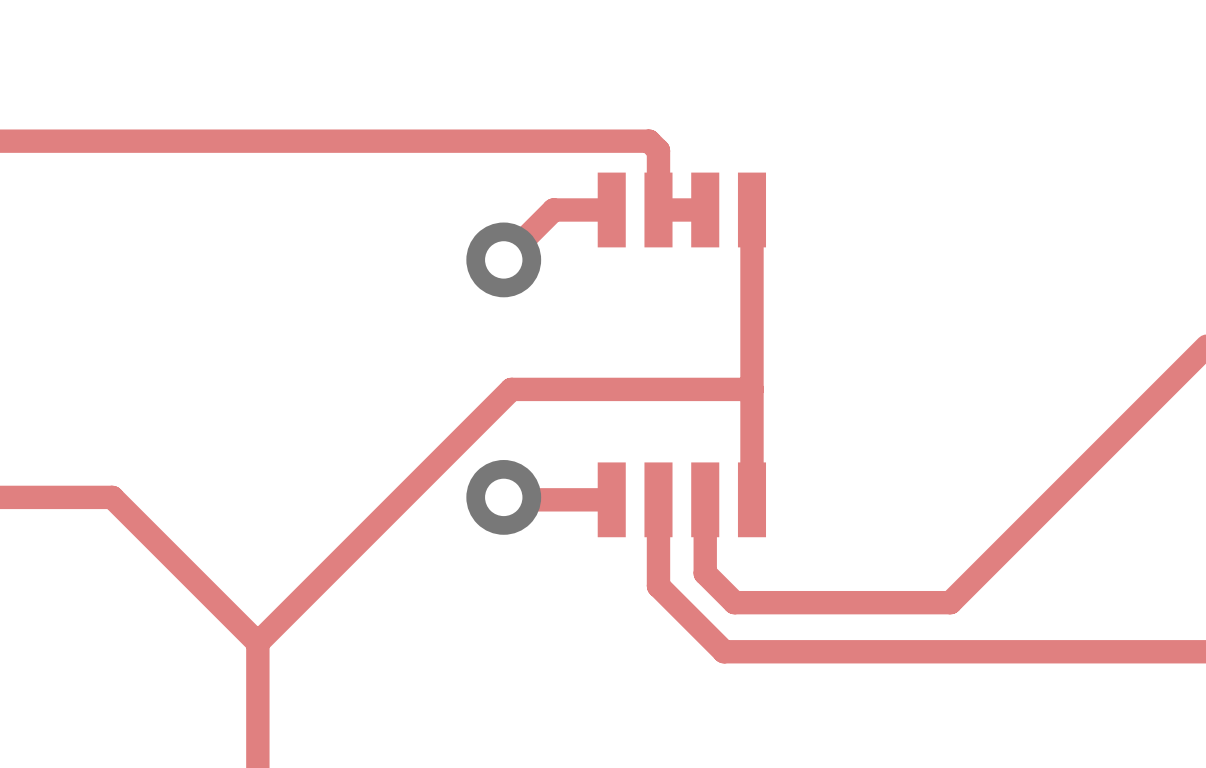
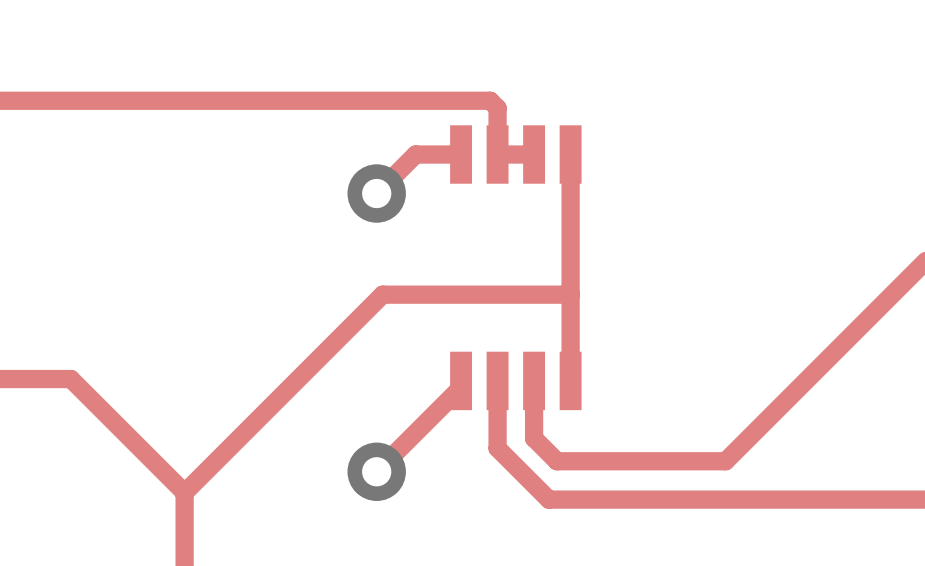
top track: (503, 497) (506, 499) (611, 499) -> (376, 471) (461, 387) (461, 380)
via position: (503, 497) -> (376, 471)

